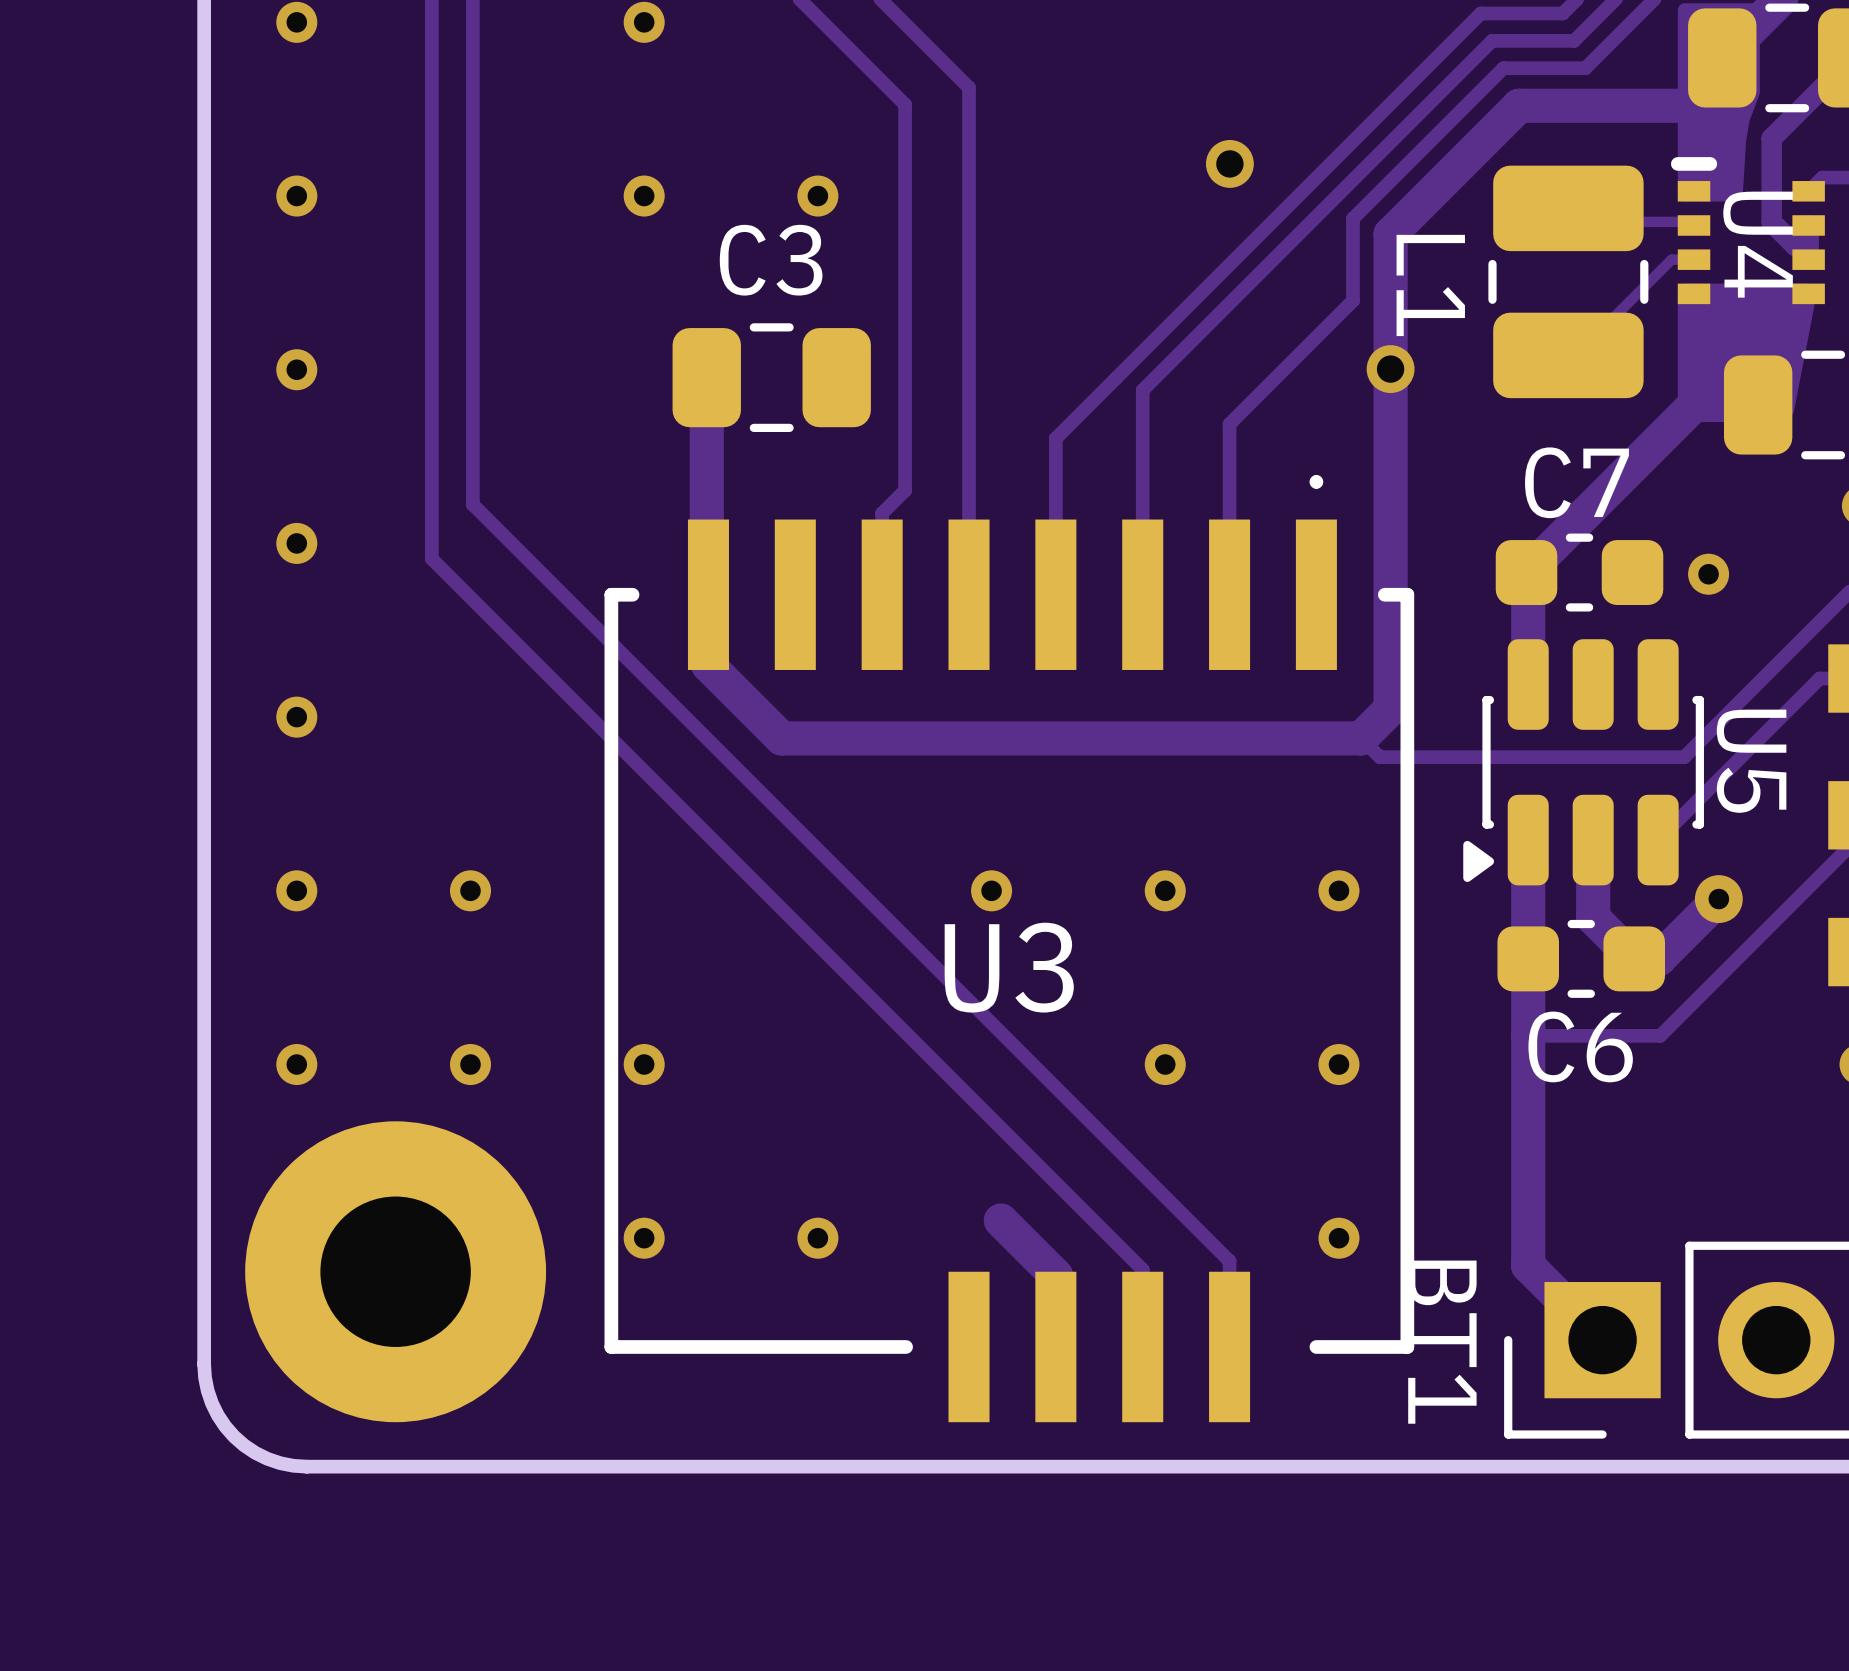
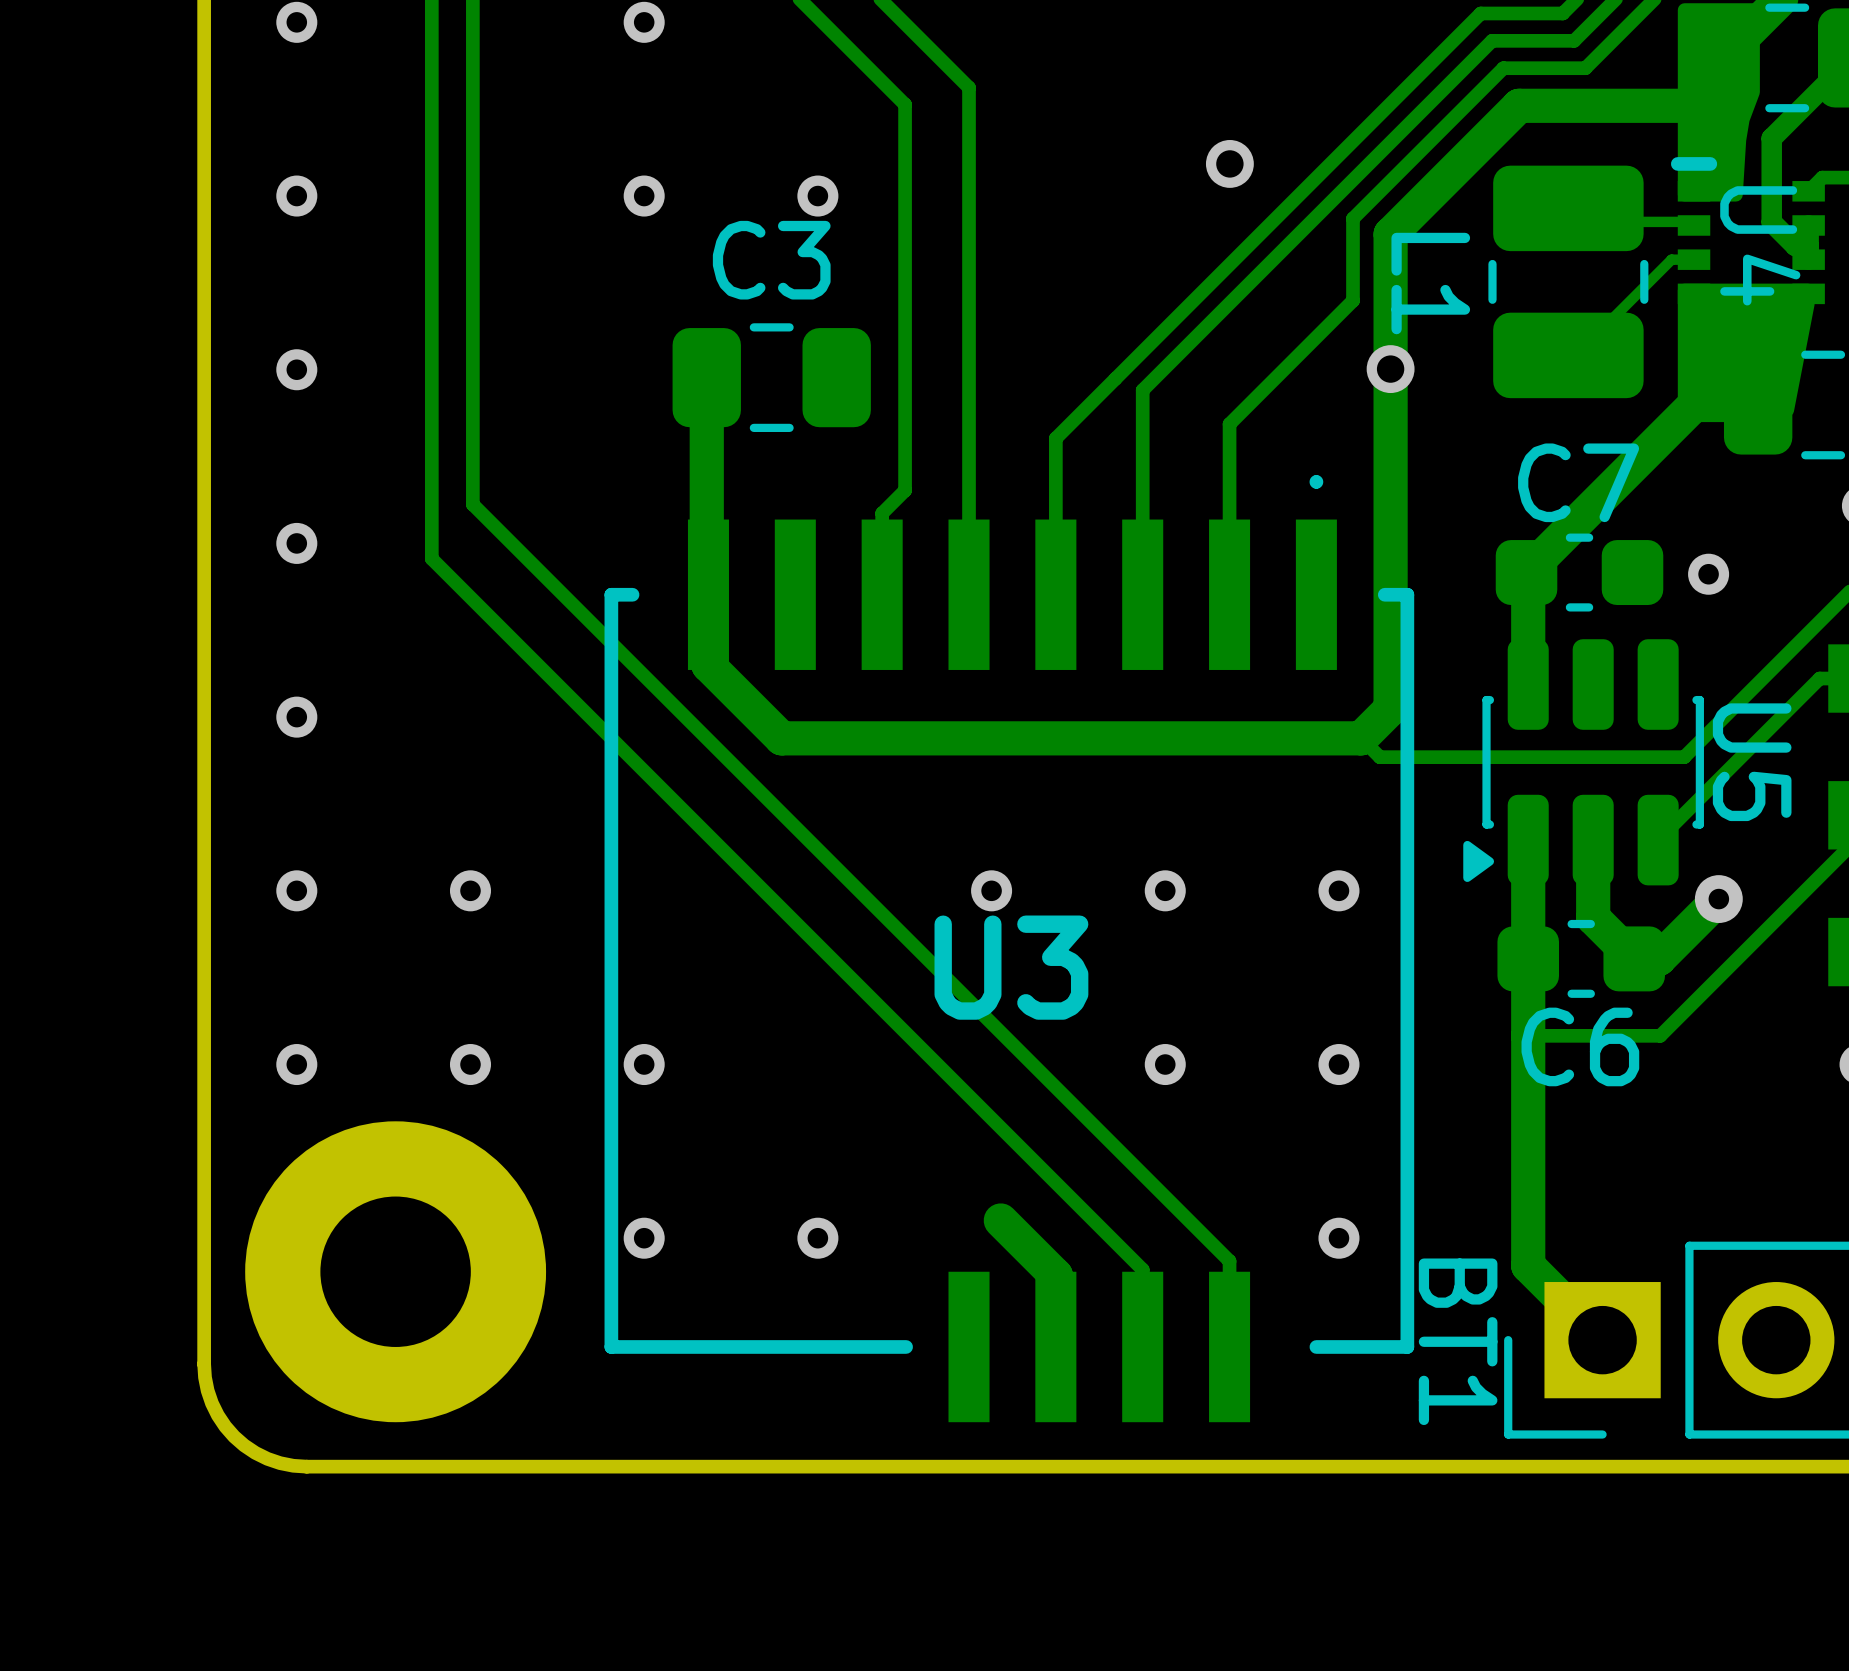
BT1 name position: BT1 (1442, 1342) -> BT1 (1458, 1341)

